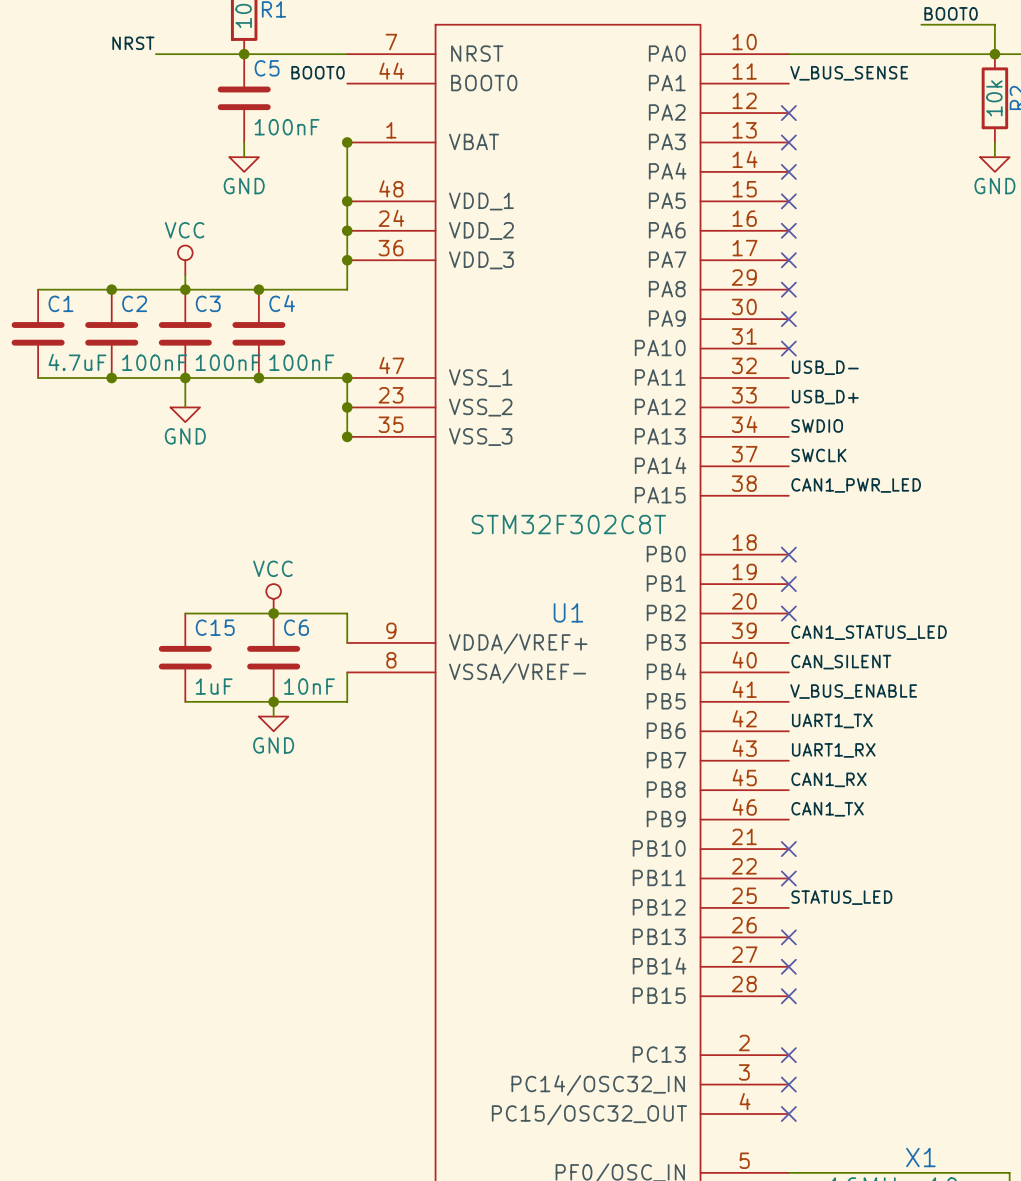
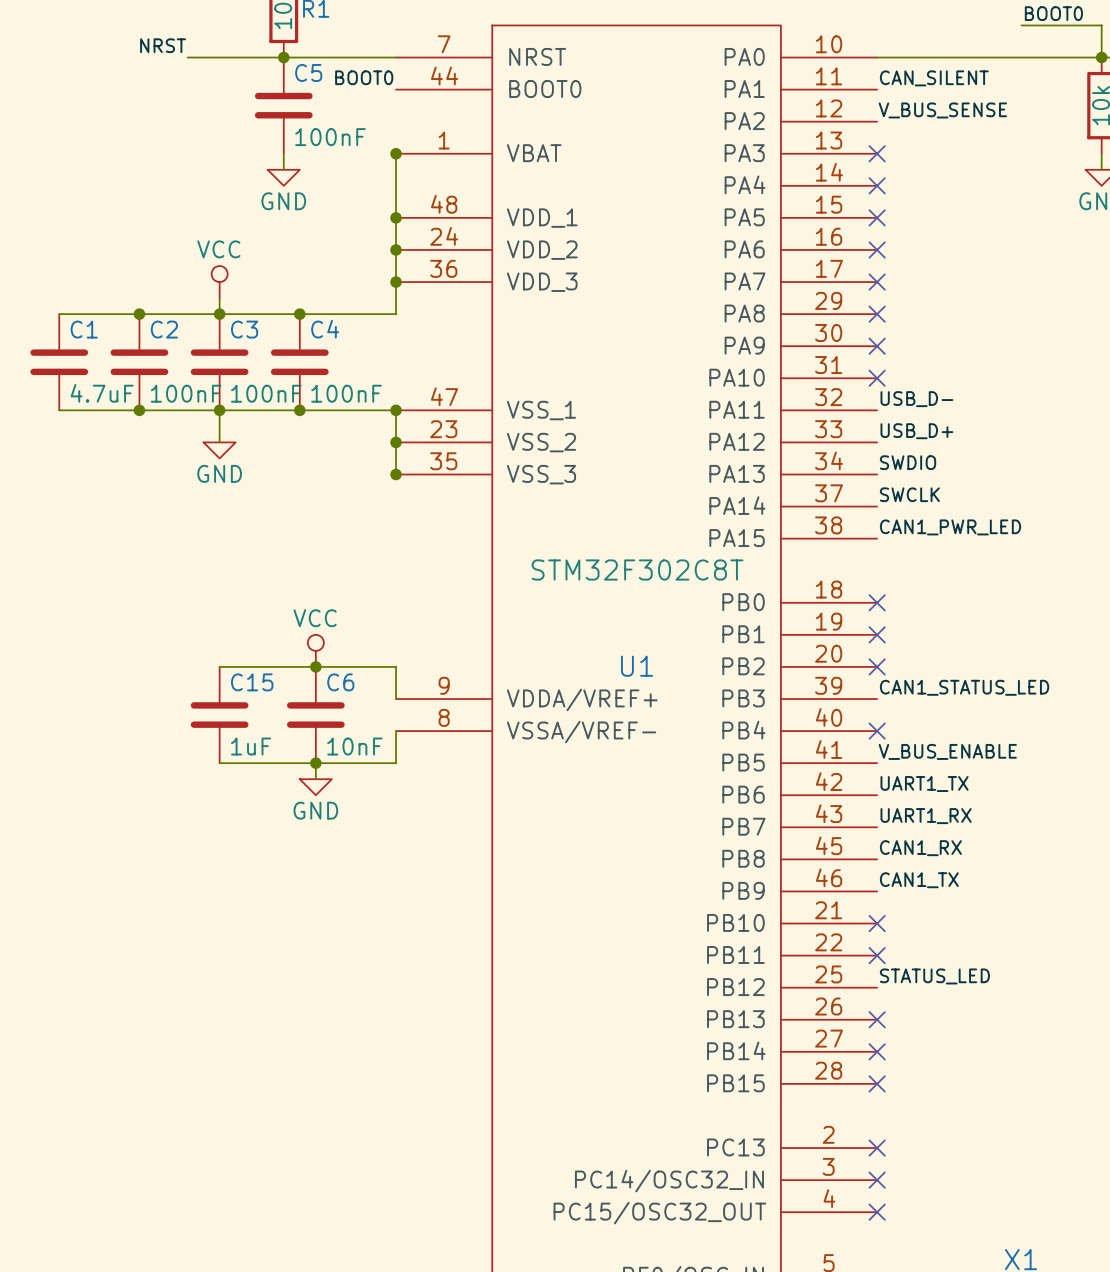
label: V_BUS_SENSE (849, 73) -> CAN_SILENT (934, 78)
label: none -> V_BUS_SENSE (942, 110)
no-connect mark: (788, 113) -> none
label: CAN_SILENT (841, 662) -> none
no-connect mark: none -> (877, 731)

